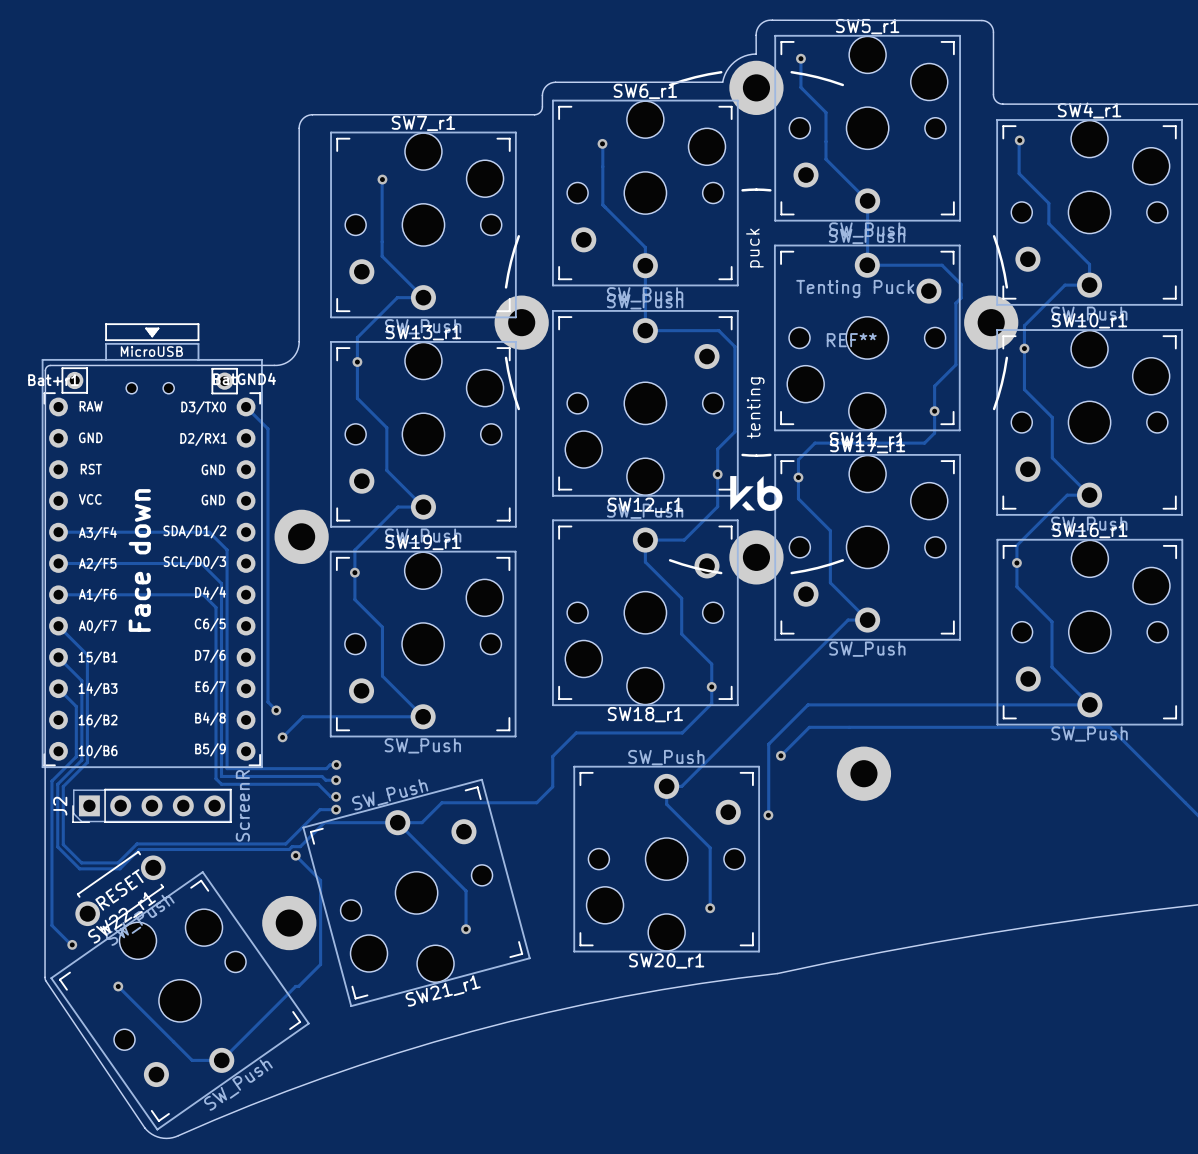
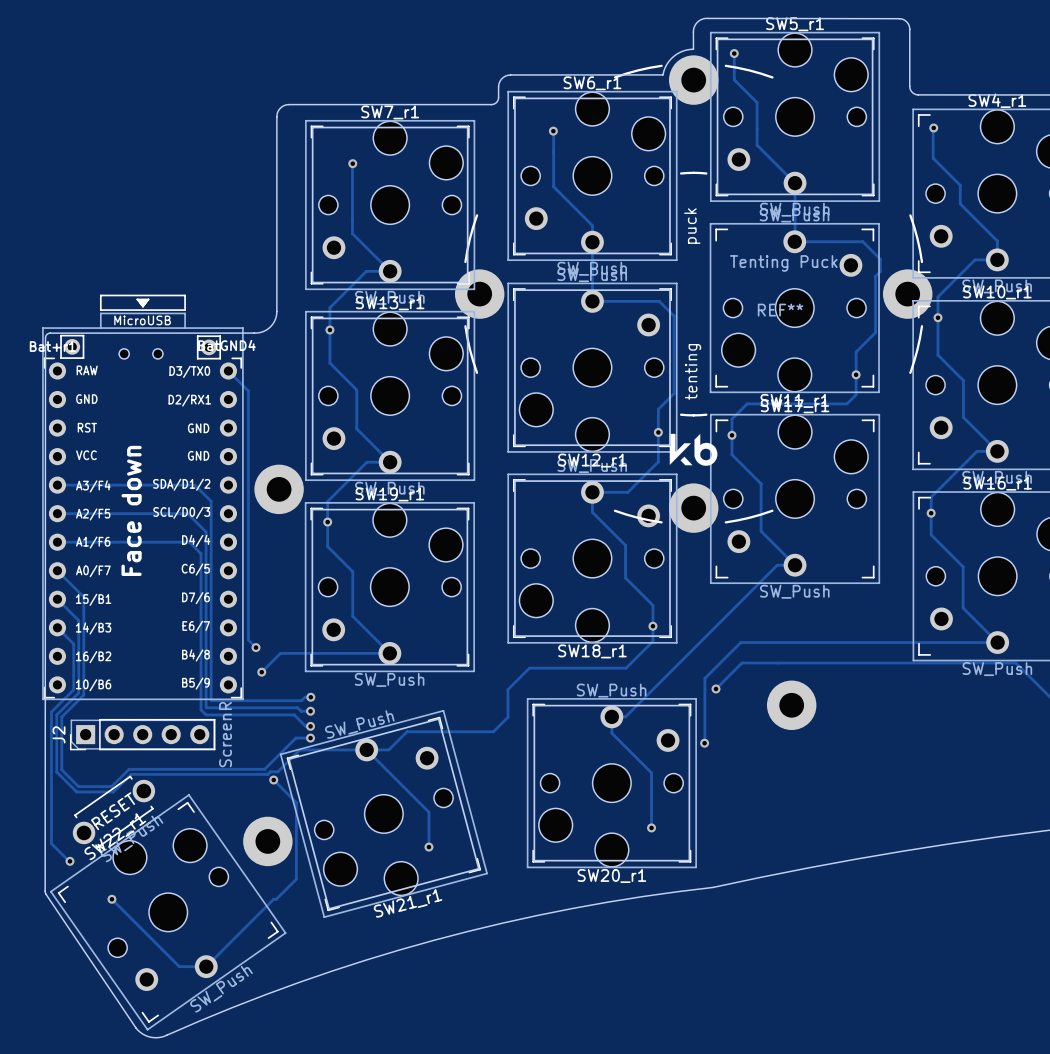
SW5_r1 footprint: [774, 34, 961, 222] -> [709, 31, 881, 202]
SW6_r1 footprint: [552, 99, 739, 287] -> [507, 90, 678, 262]
SW7_r1 footprint: [330, 131, 517, 319] -> [305, 119, 476, 291]
SW12_r1 footprint: [552, 310, 739, 497] -> [507, 282, 678, 453]
SW13_r1 footprint: [330, 340, 517, 528] -> [305, 310, 476, 482]
SW18_r1 footprint: [552, 519, 739, 707] -> [507, 473, 678, 644]
SW19_r1 footprint: [329, 550, 517, 738] -> [304, 502, 475, 673]
SW20_r1 footprint: [573, 765, 761, 953] -> [526, 698, 697, 869]
SW21_r1 footprint: [302, 778, 531, 1008] -> [279, 709, 488, 919]

